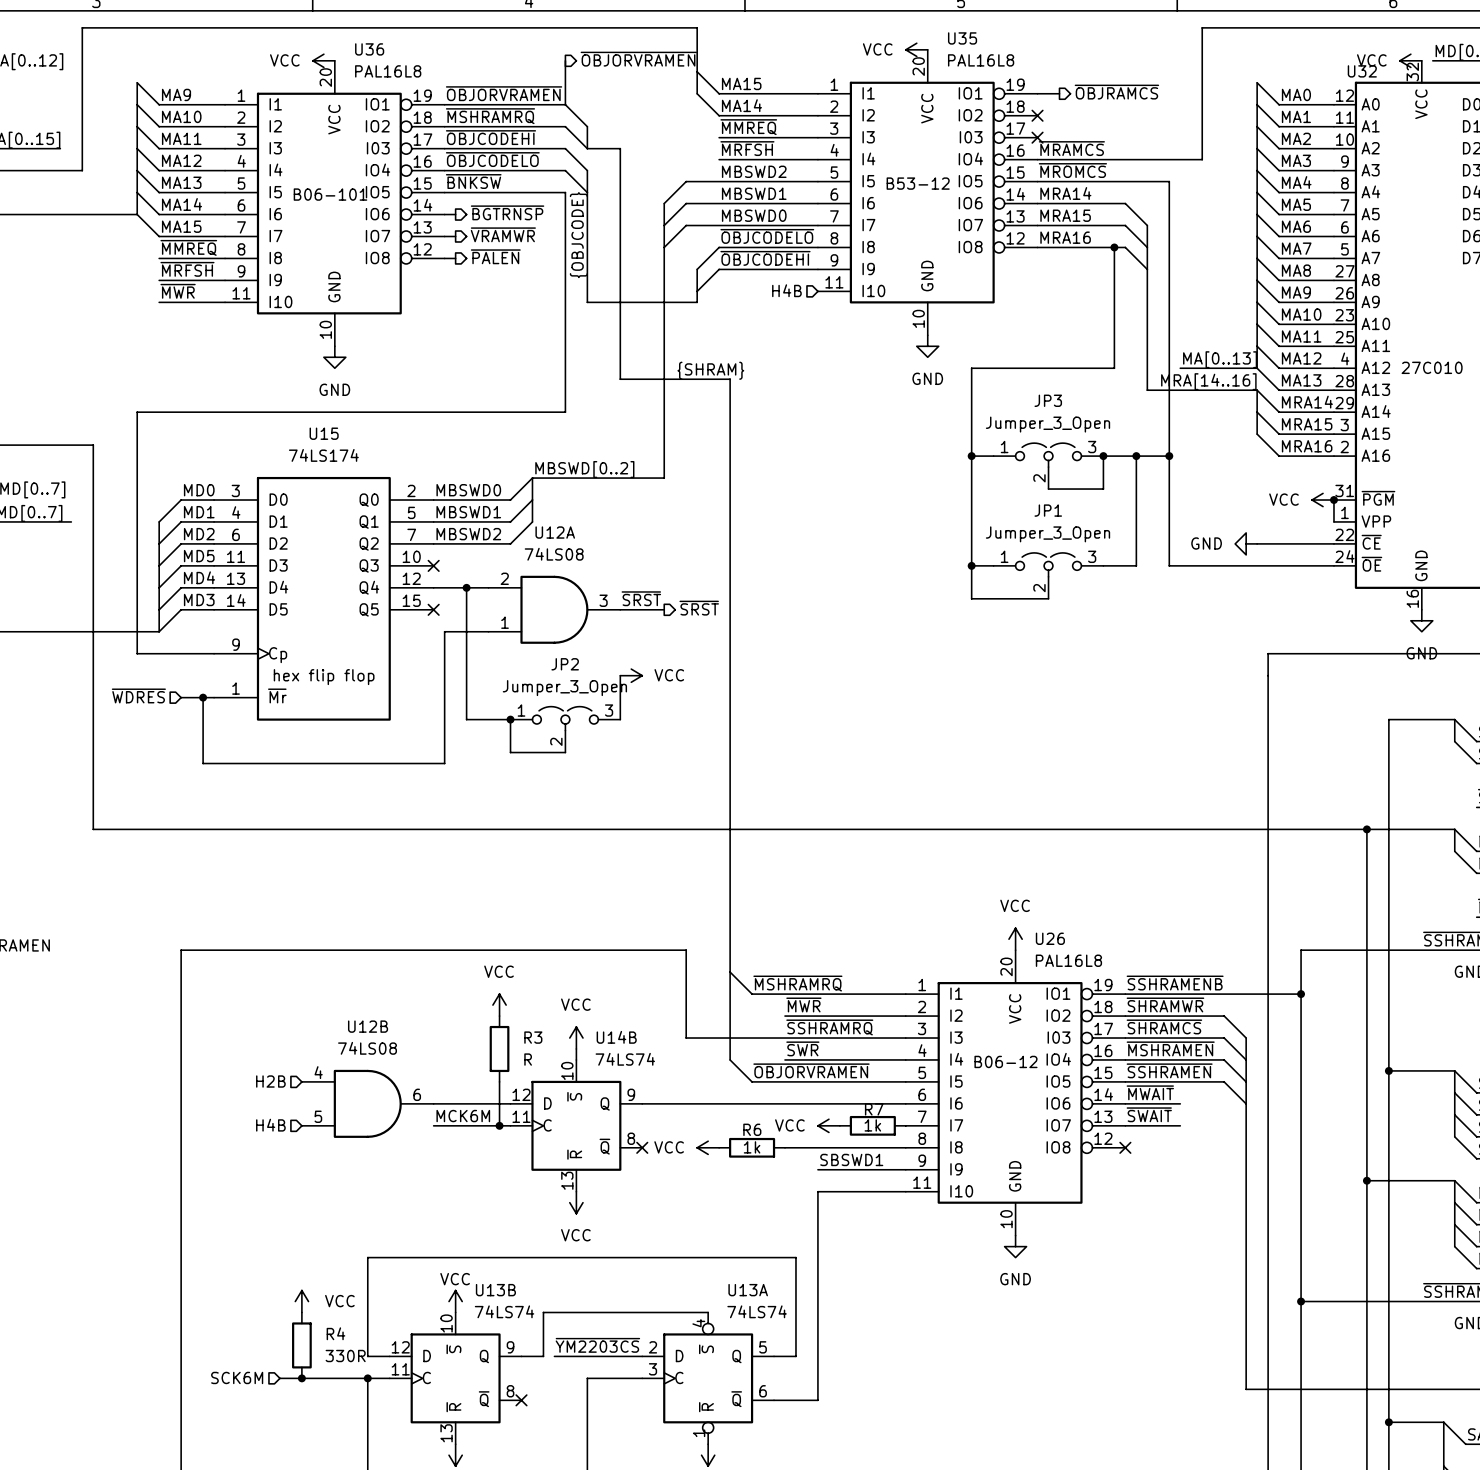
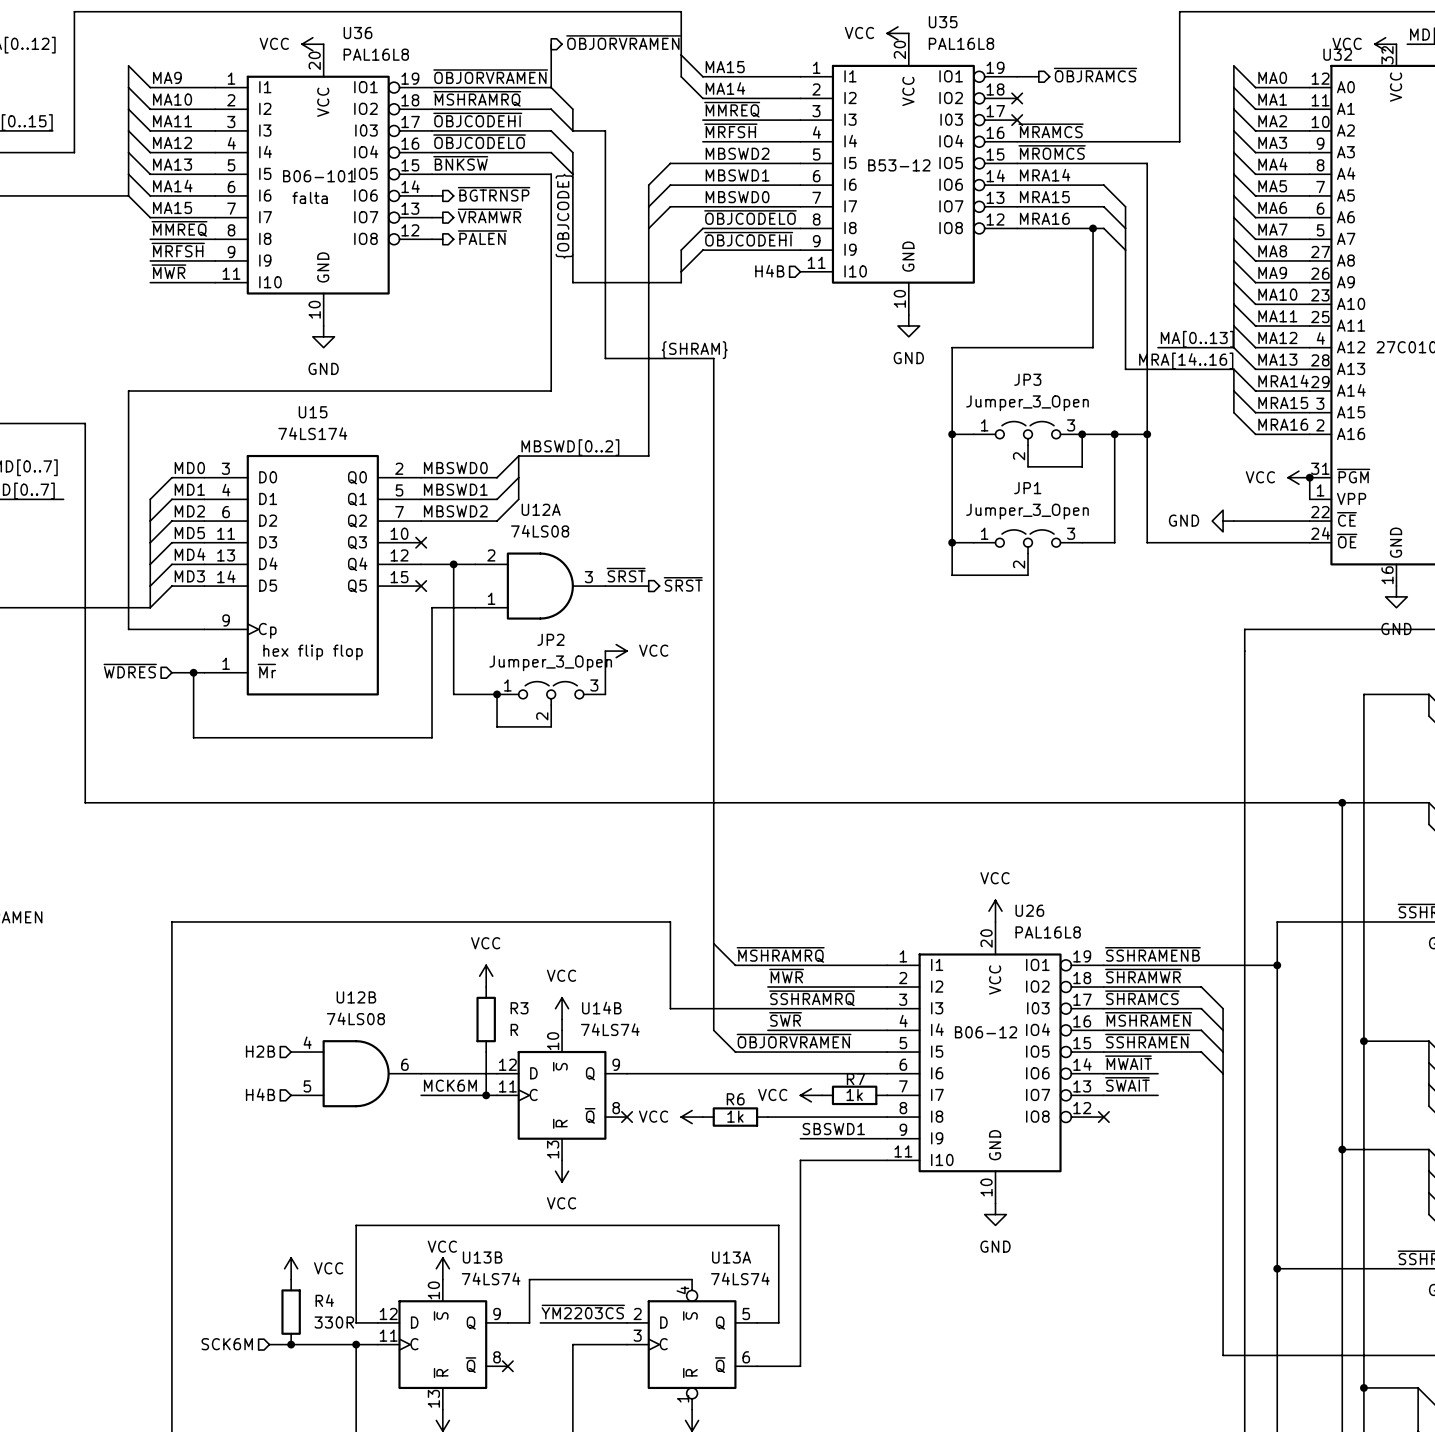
text: none -> falta (310, 197)

